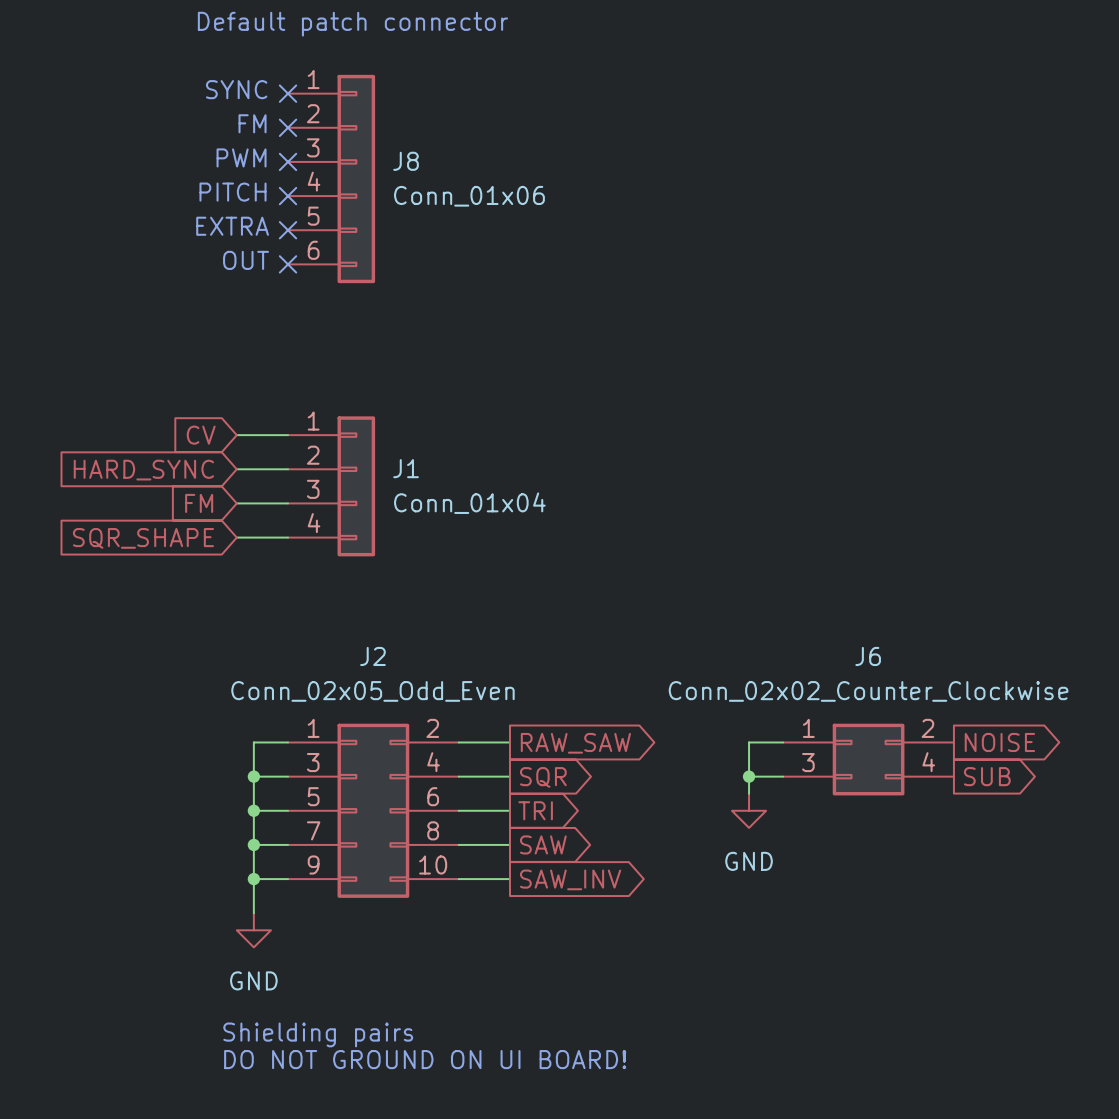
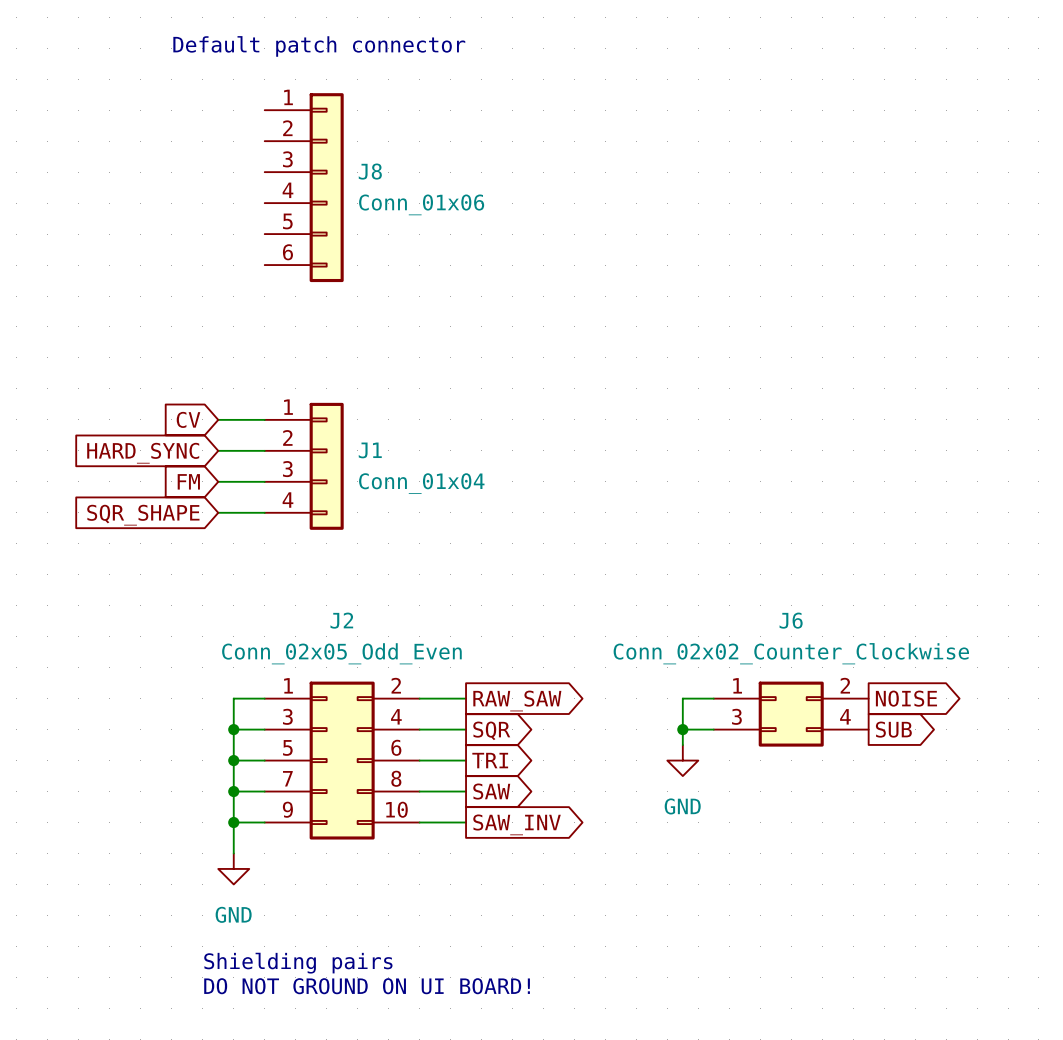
text: SYNC (236, 89) -> none
no-connect mark: (288, 93) -> none
text: FM (252, 123) -> none
no-connect mark: (288, 127) -> none
text: PWM (241, 157) -> none
no-connect mark: (288, 161) -> none
text: PITCH (233, 192) -> none
no-connect mark: (288, 196) -> none
text: EXTRA (232, 226) -> none
no-connect mark: (288, 230) -> none
text: OUT (246, 260) -> none
no-connect mark: (288, 264) -> none

